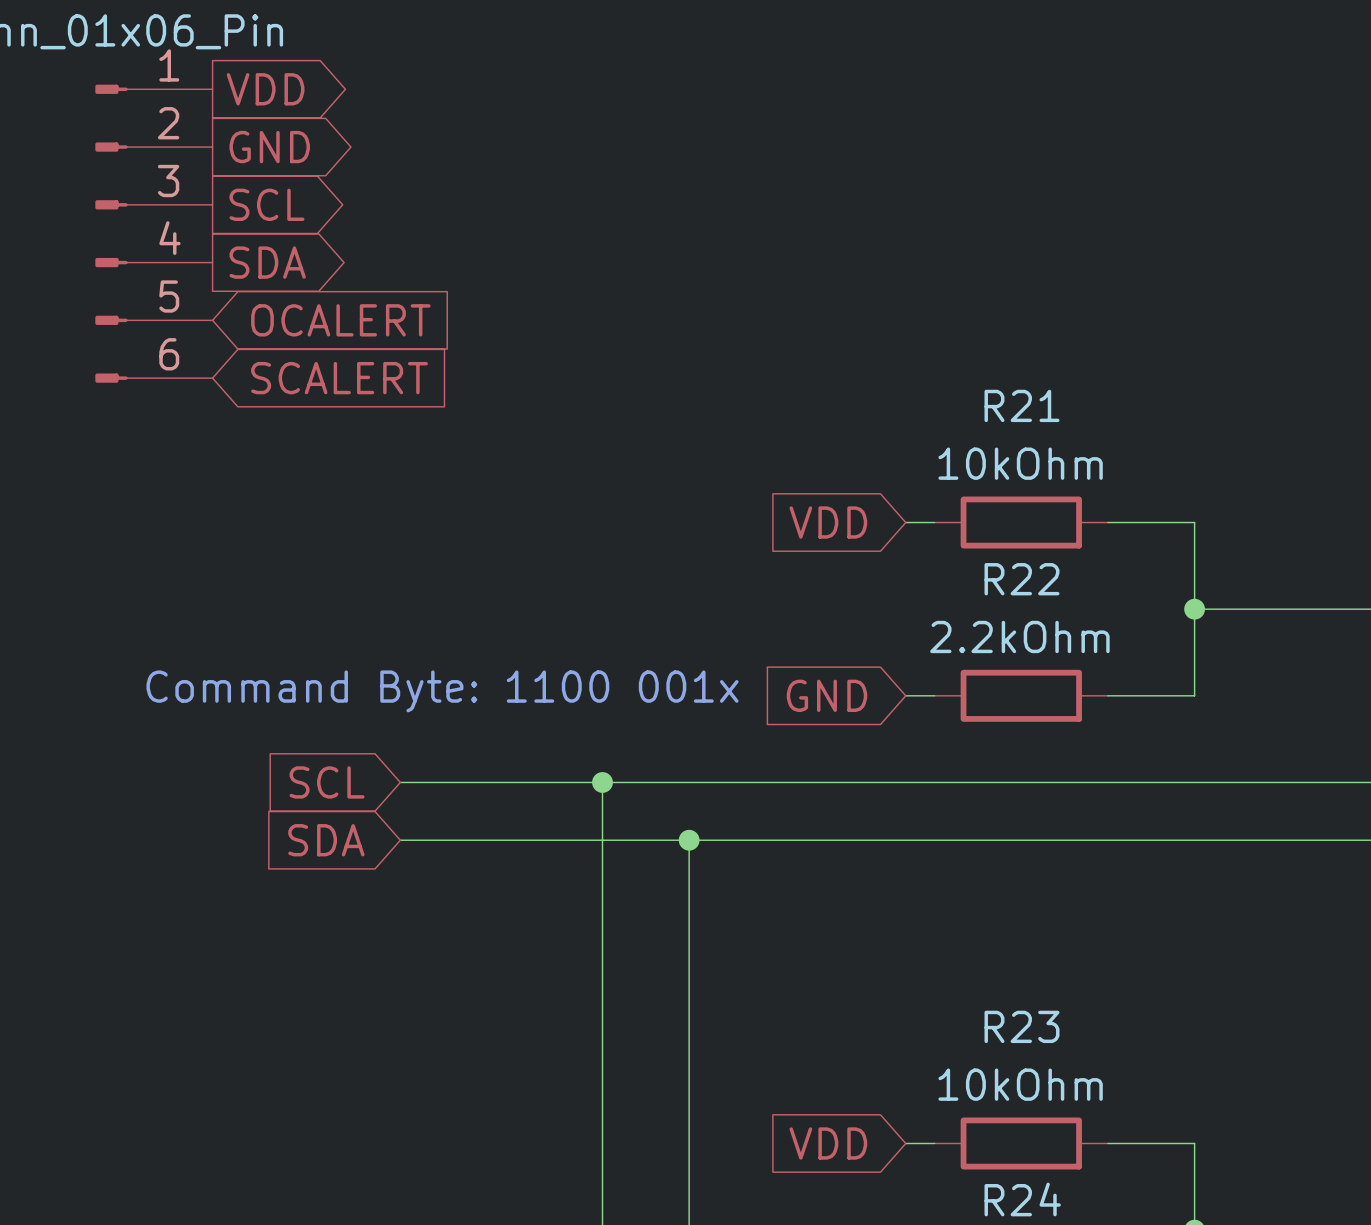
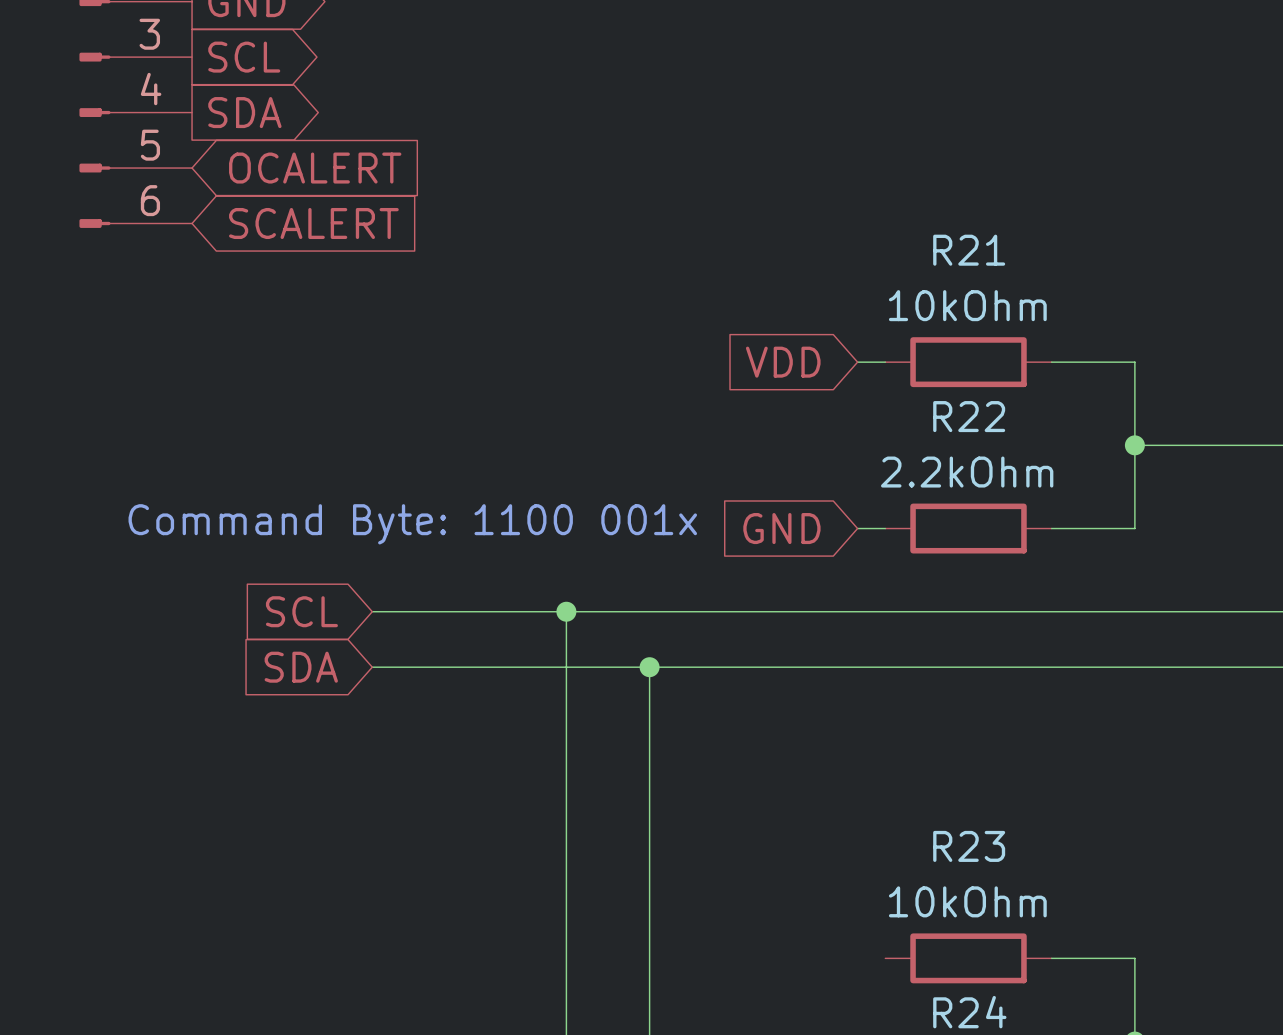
global label: VDD (828, 1143) -> none
wire: (905, 1143) (934, 1143) -> none

